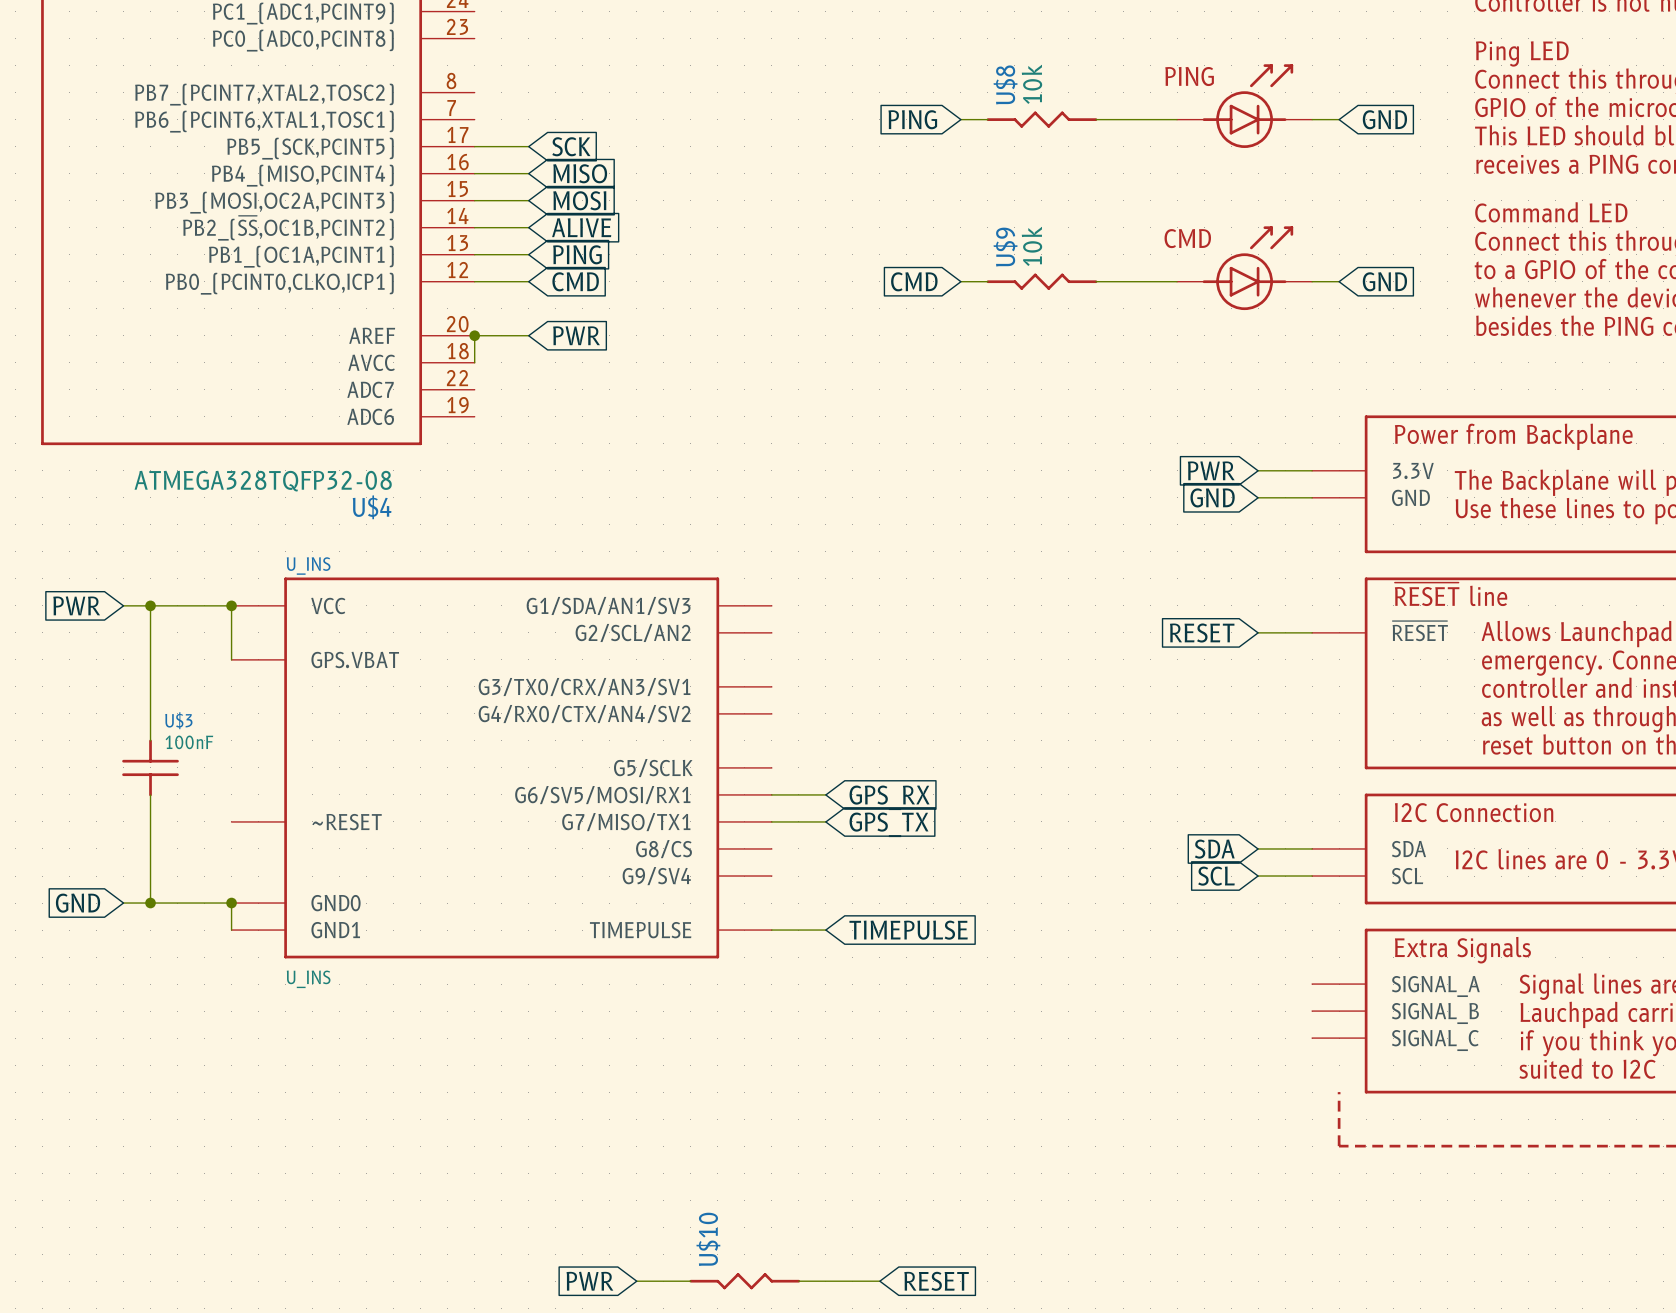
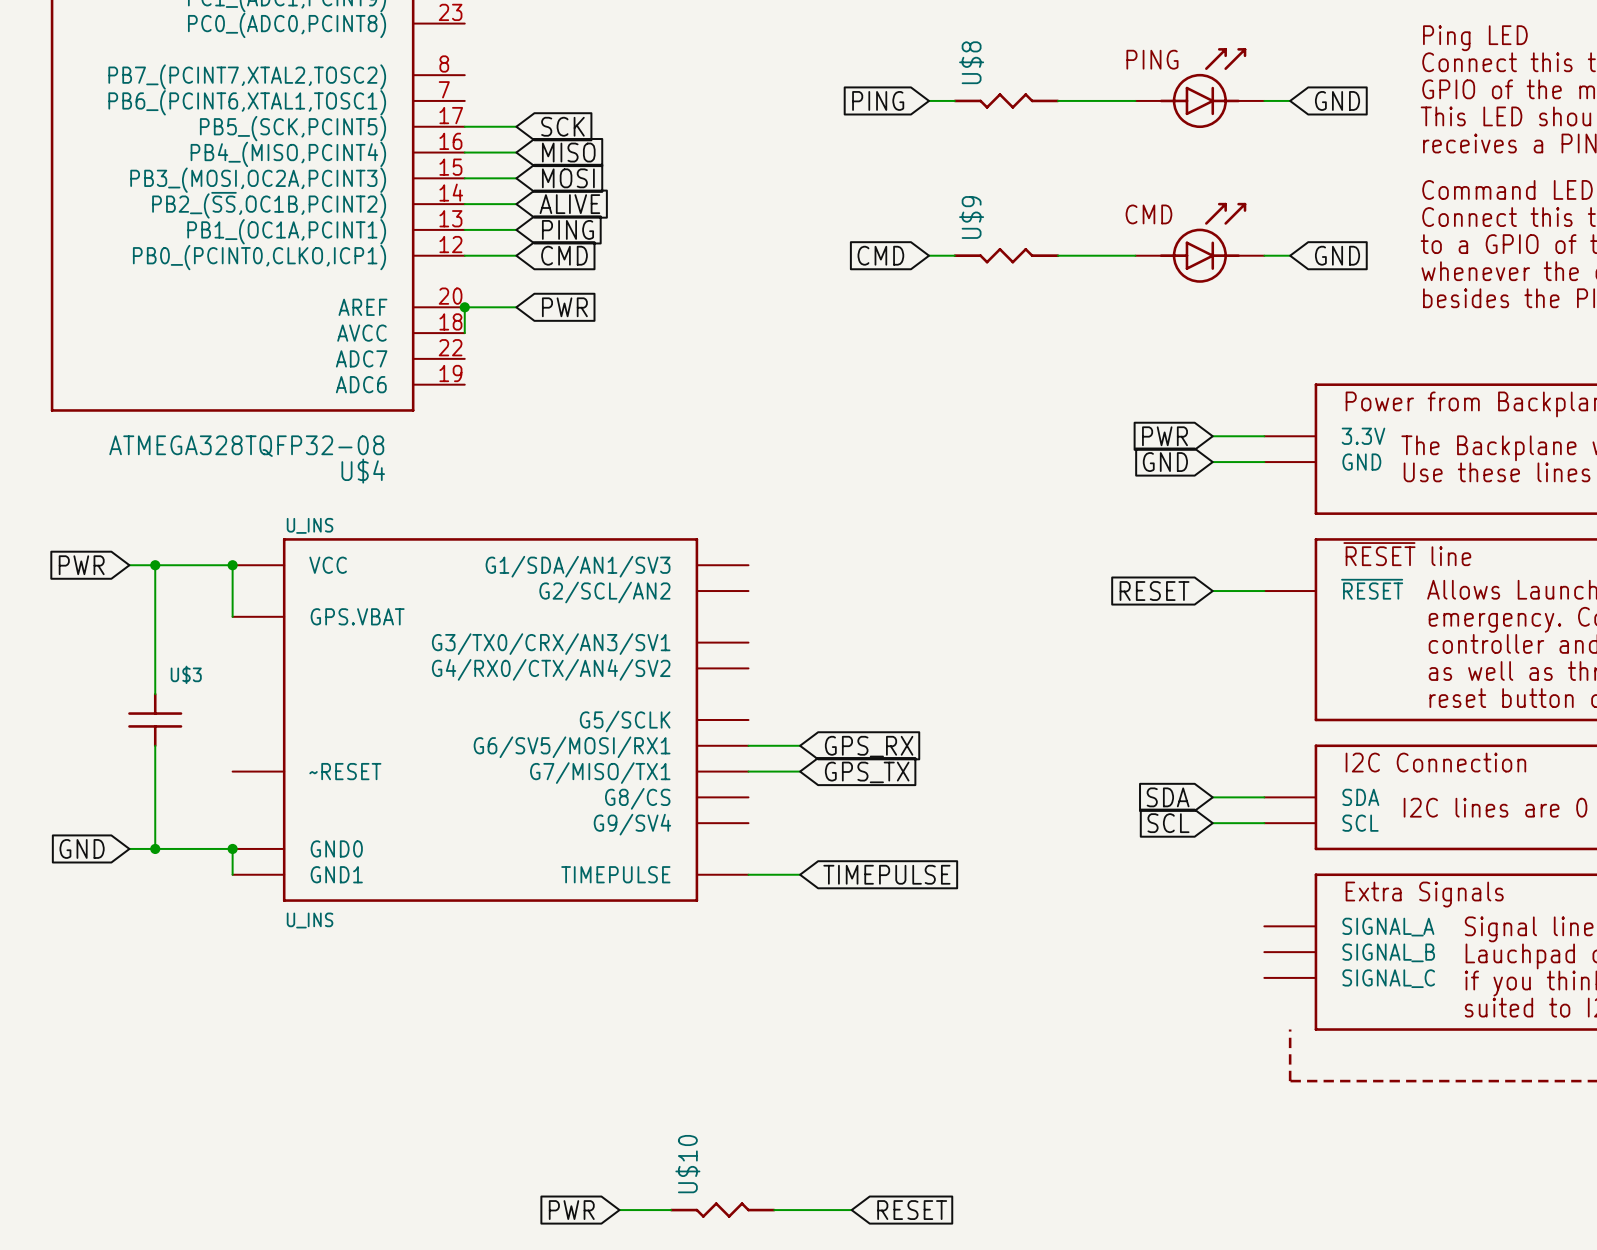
U$8 value: 10k (1031, 84) -> none
U$9 value: 10k (1031, 246) -> none
U$3 value: 100nF (189, 742) -> none

